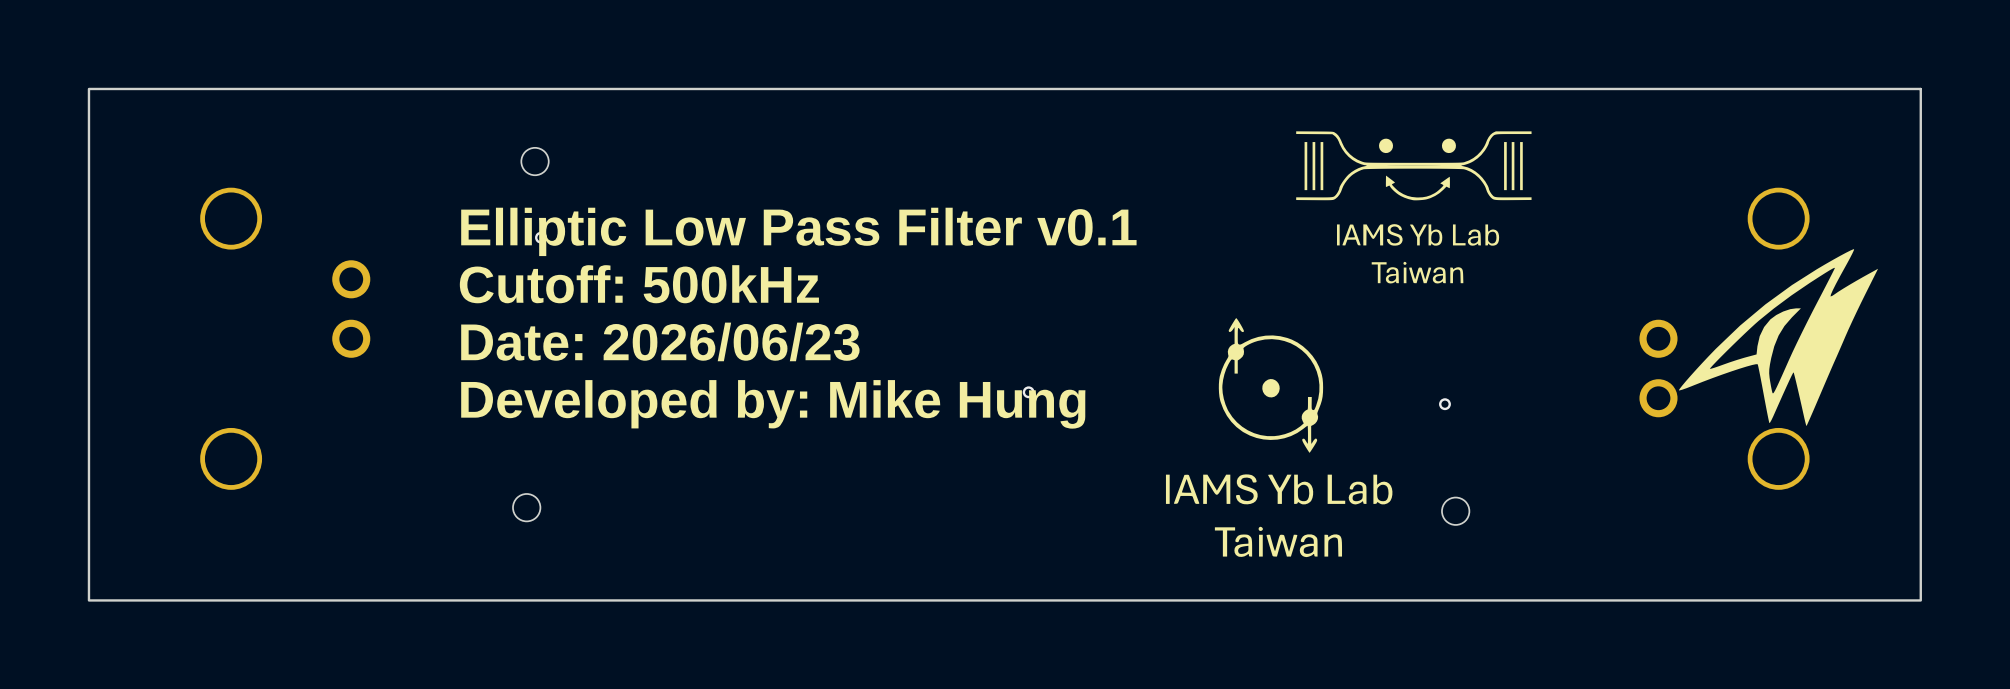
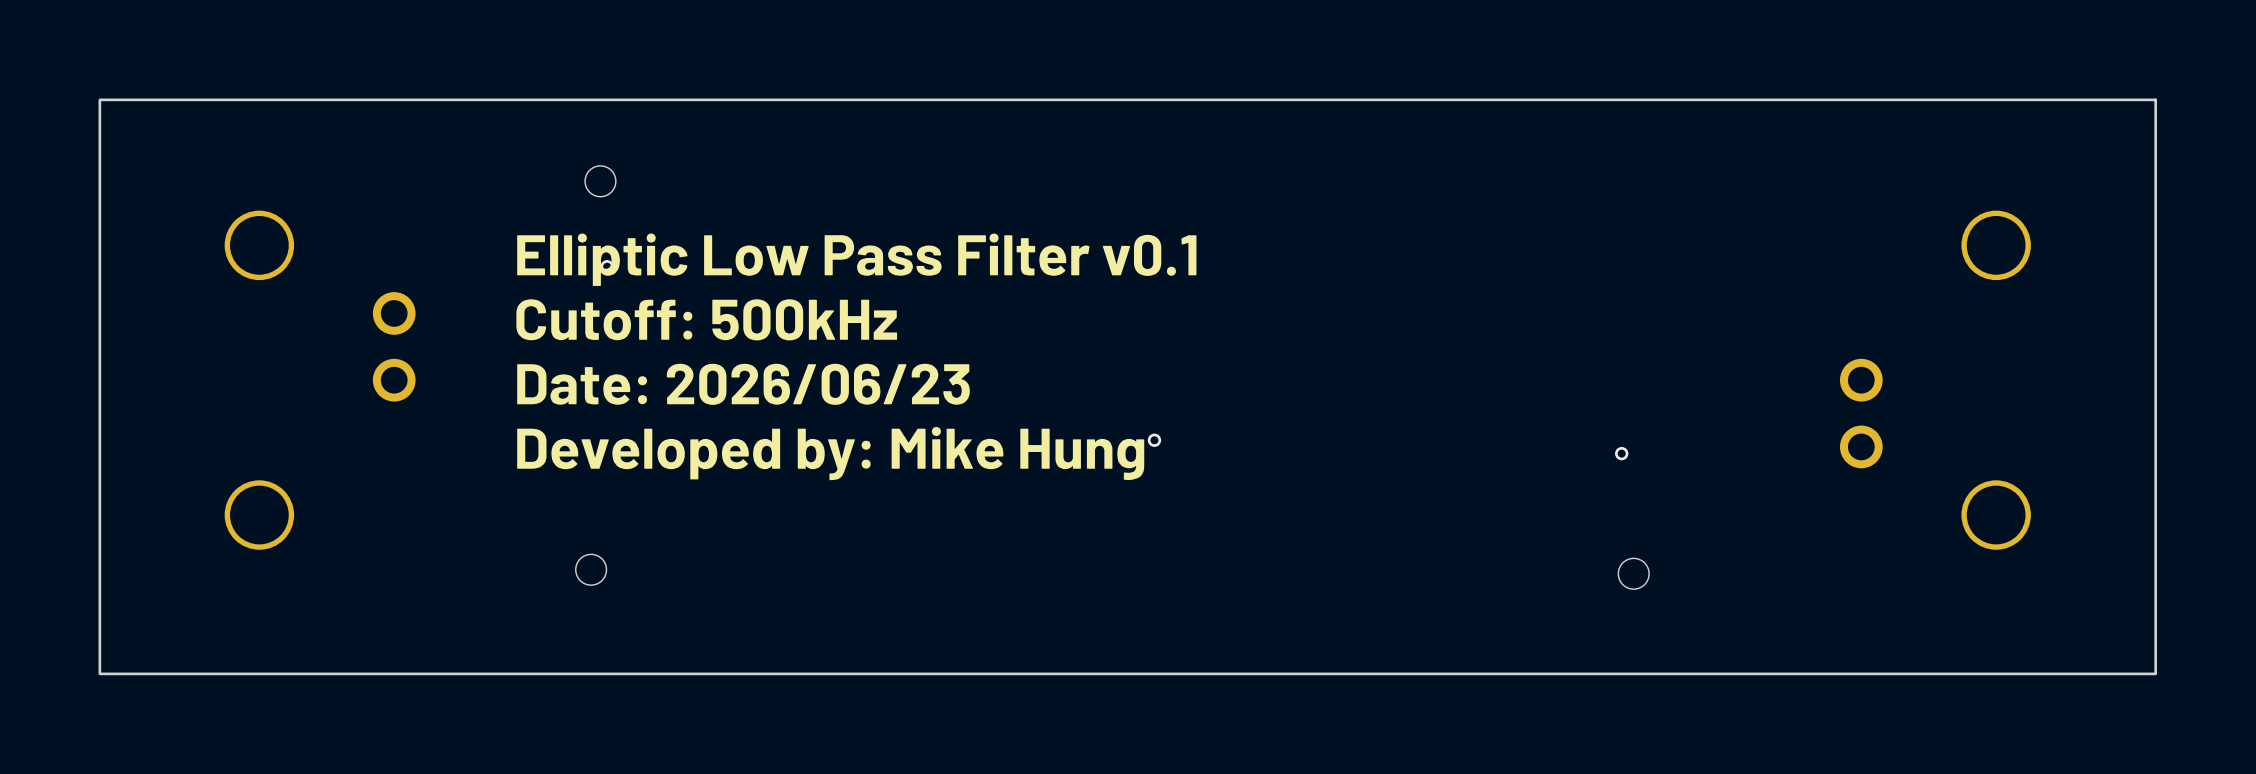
drawing: [1296, 131, 1532, 284] -> none
drawing: [1678, 249, 1879, 427] -> none
drawing: [1165, 318, 1393, 558] -> none

